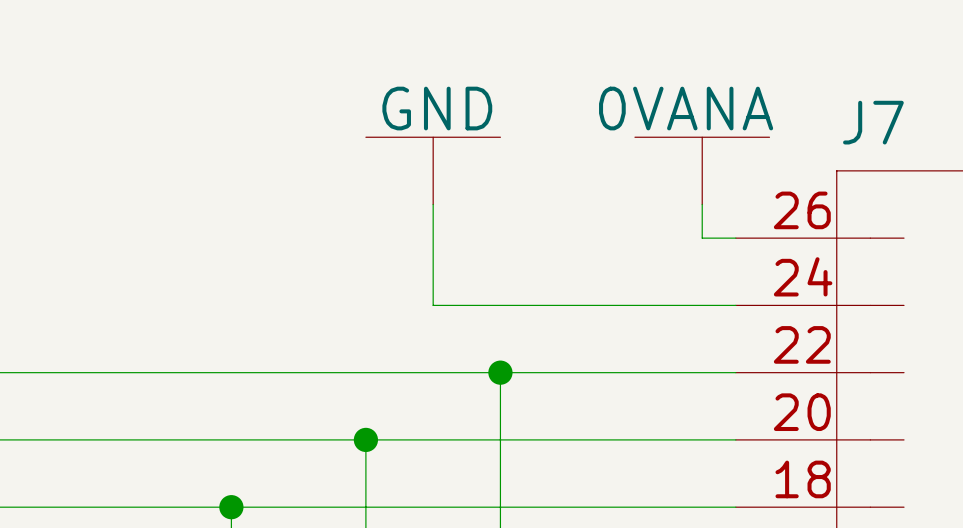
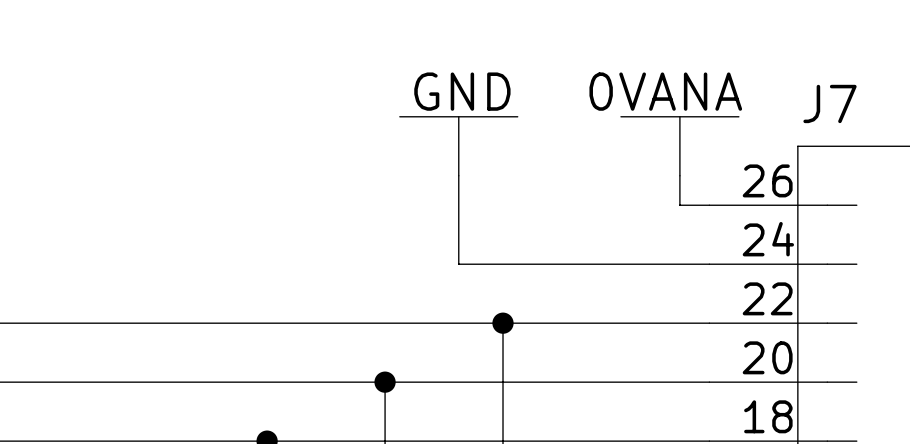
power symbol position: GND (433, 170) -> GND (458, 146)
wire: (433, 204) (433, 305) (449, 305) -> (458, 175) (458, 264)

